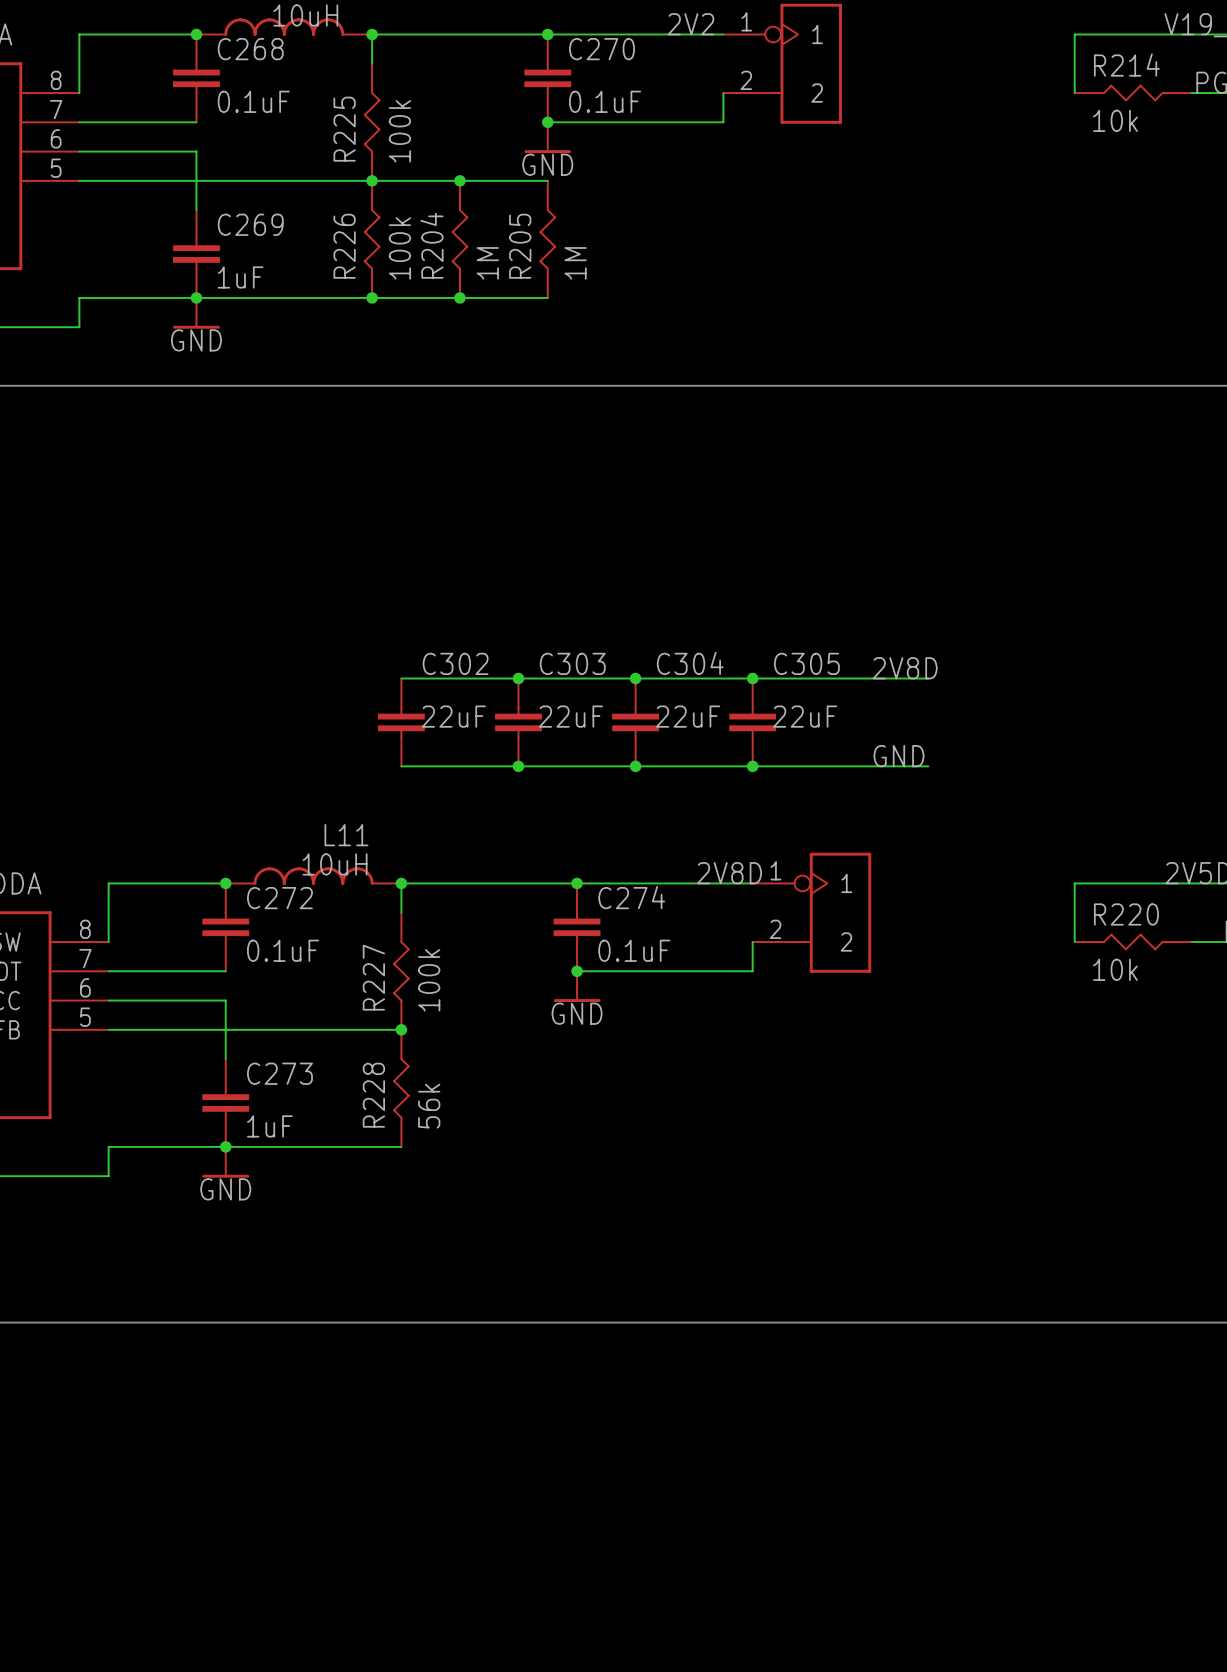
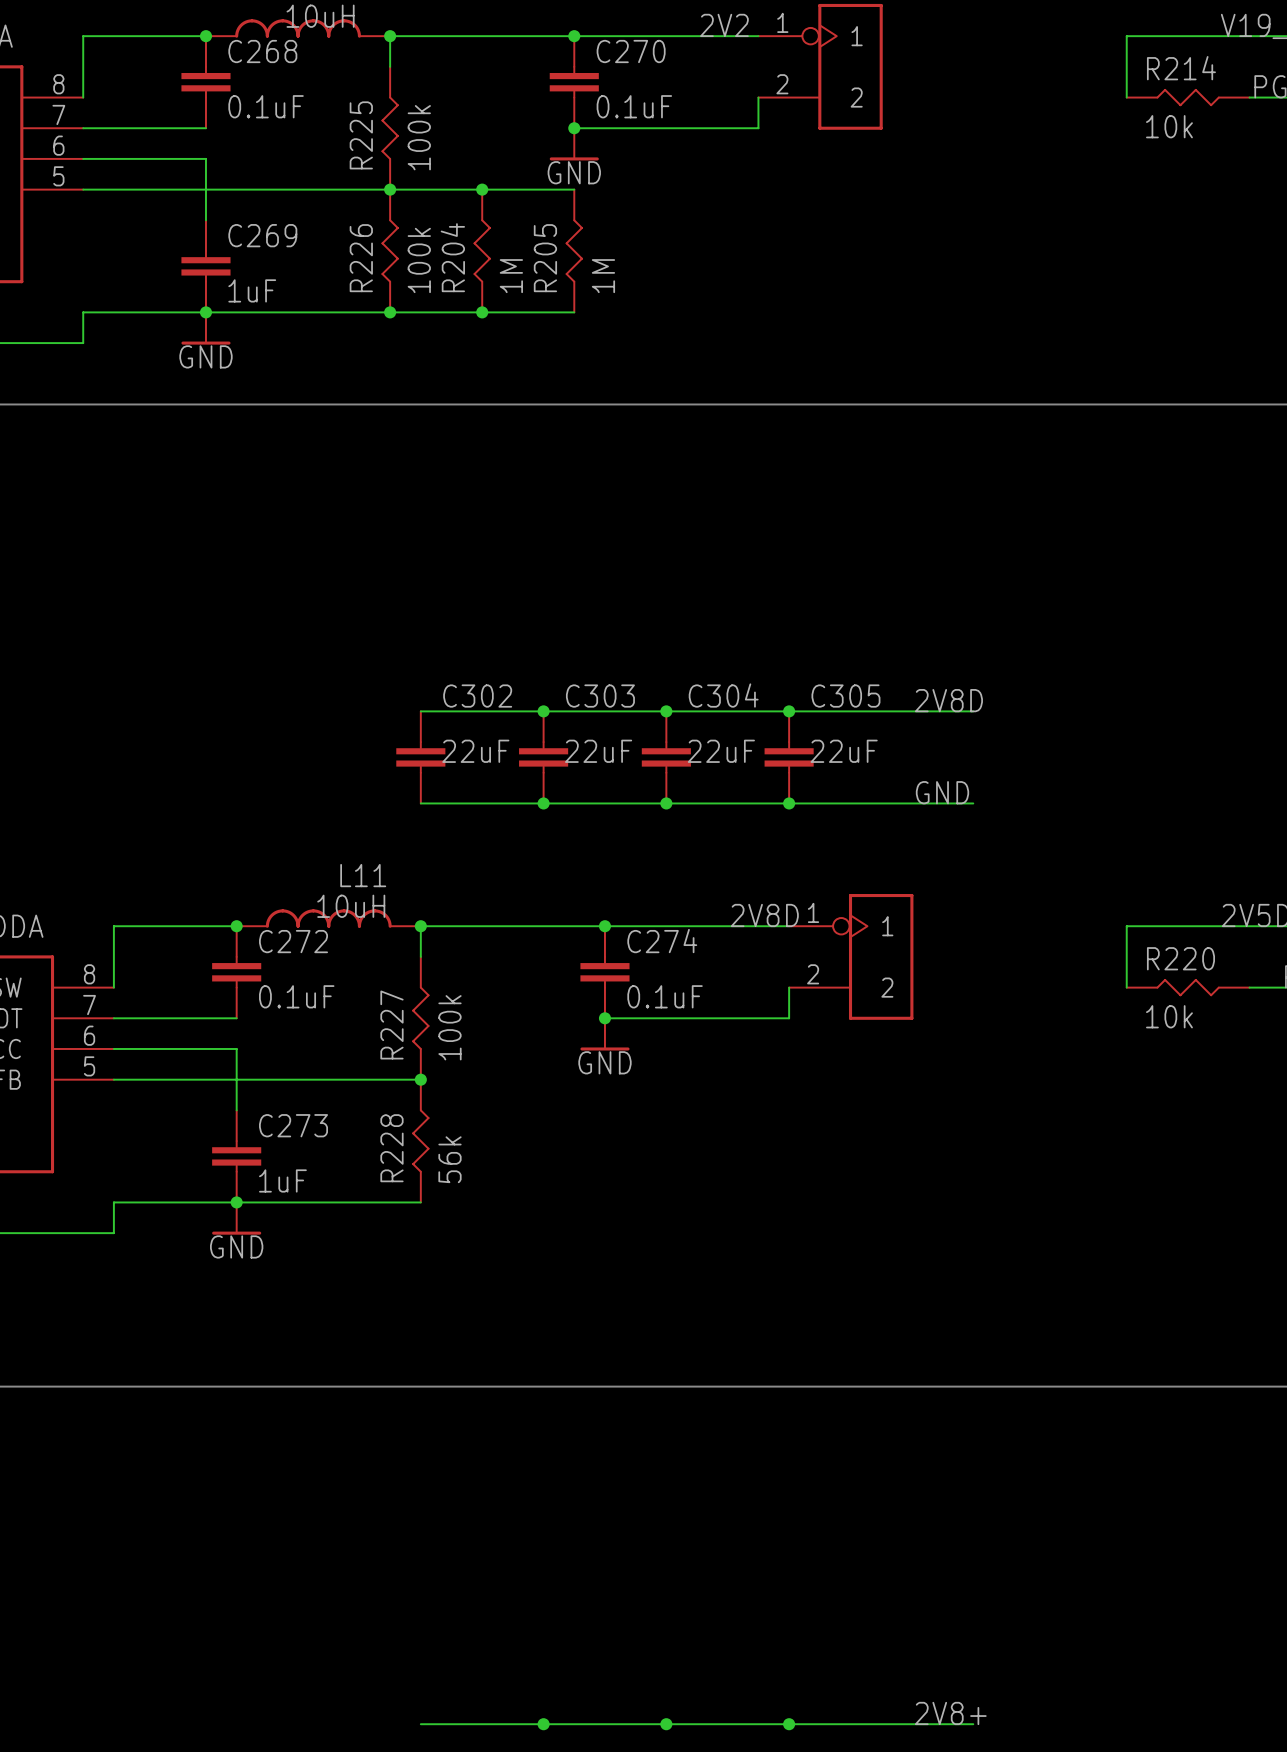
label: none -> 2V8+ (950, 1713)
wire: none -> (420, 1724) (973, 1724)
junction: none -> (543, 1724)
junction: none -> (666, 1724)
junction: none -> (789, 1724)

